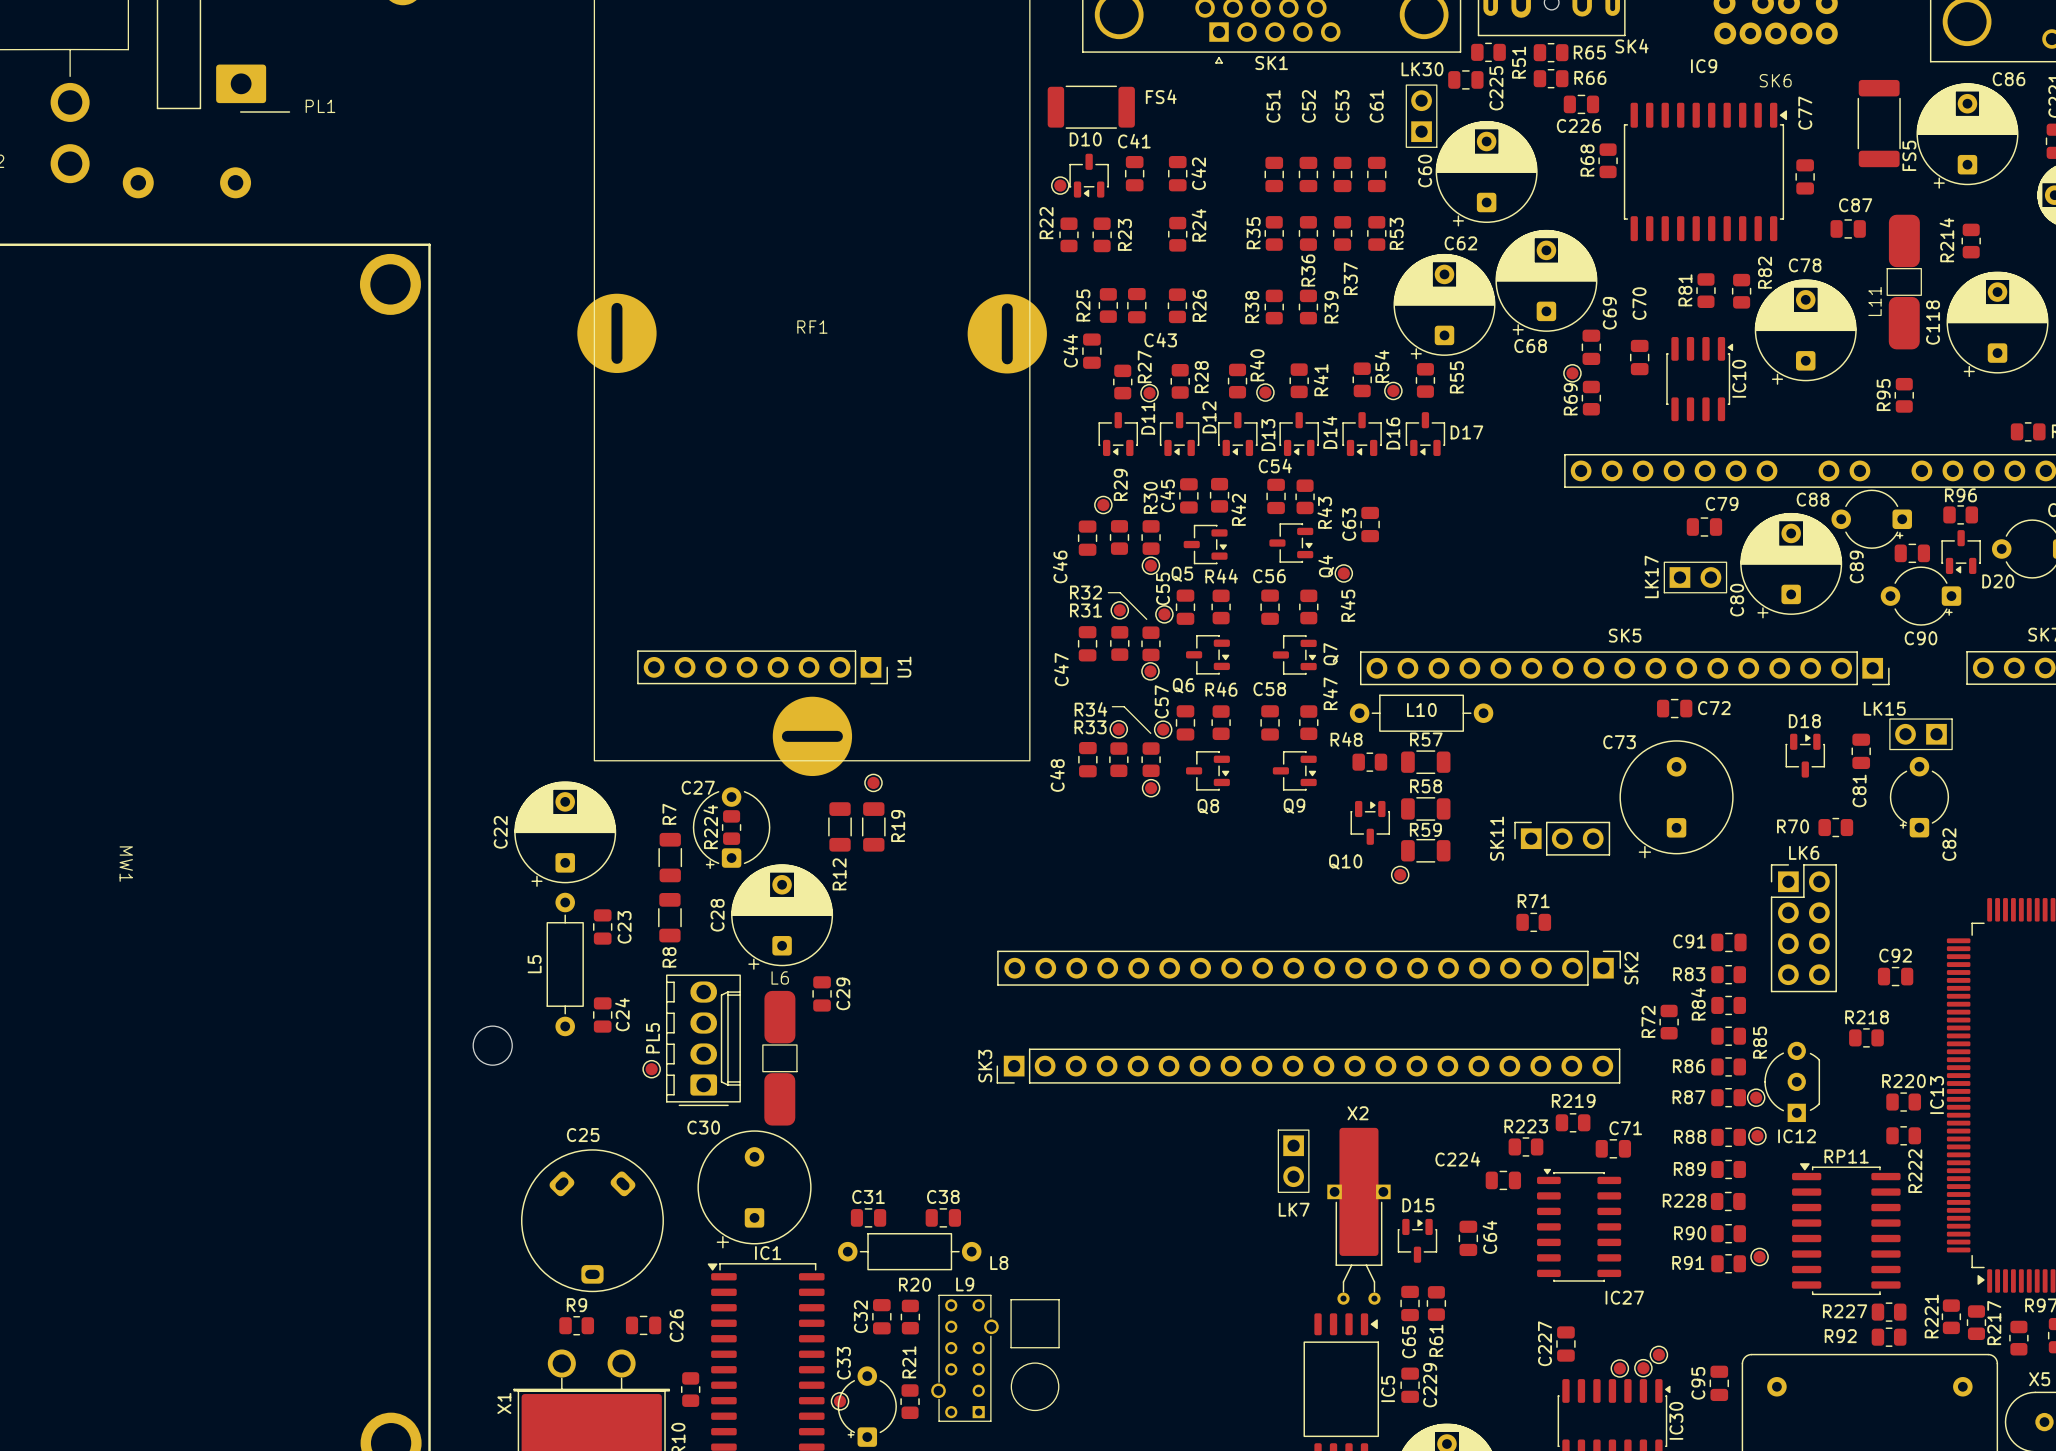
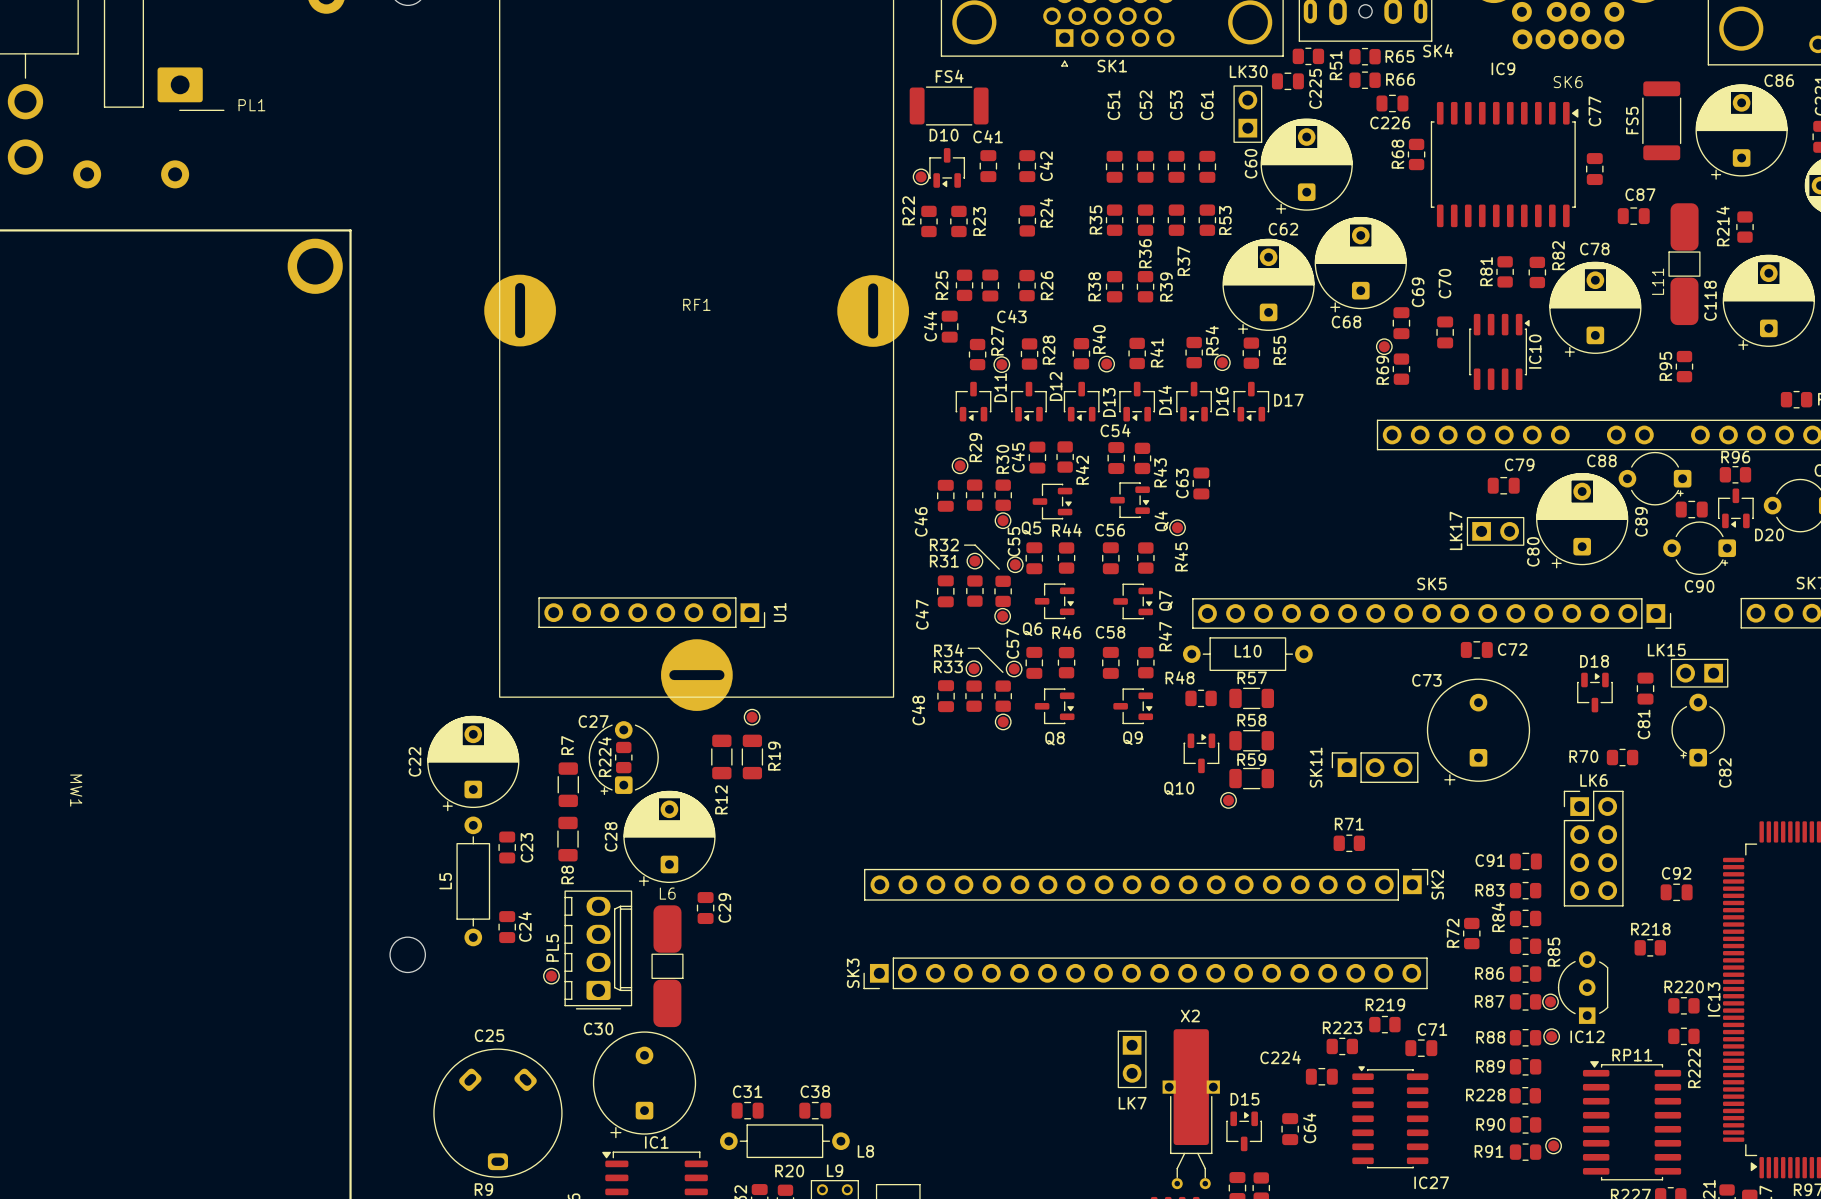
FS4 name position: FS4 (1161, 96) -> FS4 (949, 76)
FS5 name position: FS5 (1909, 155) -> FS5 (1632, 120)

